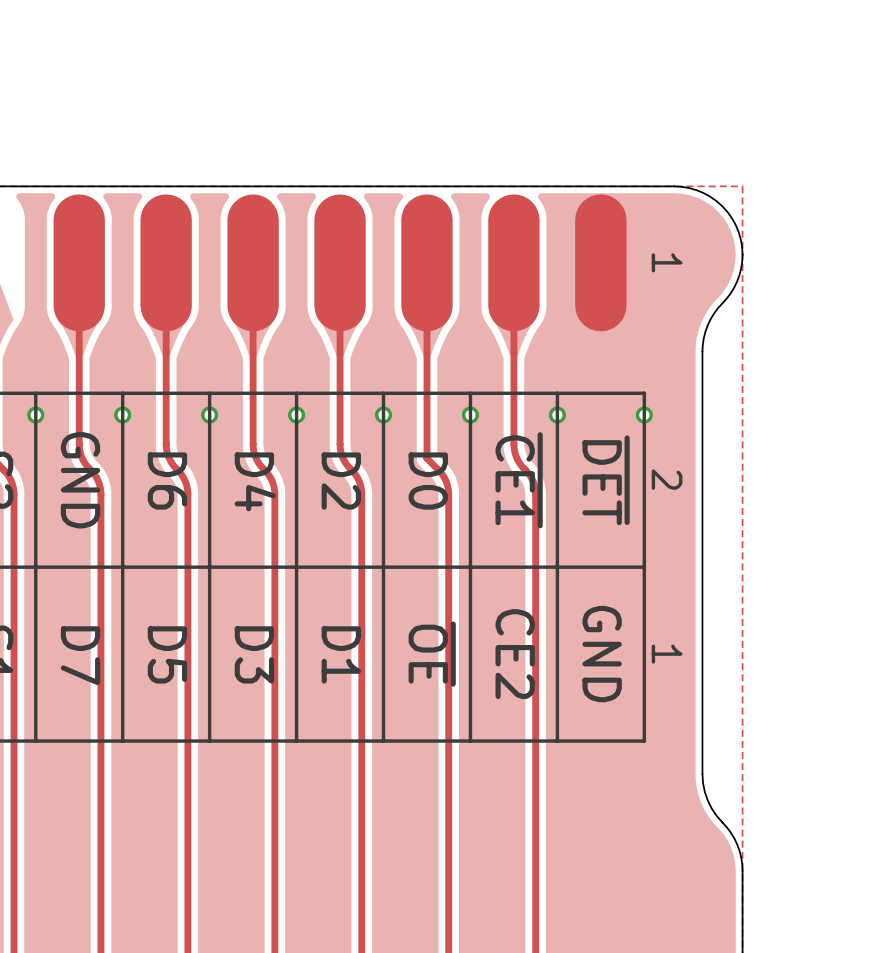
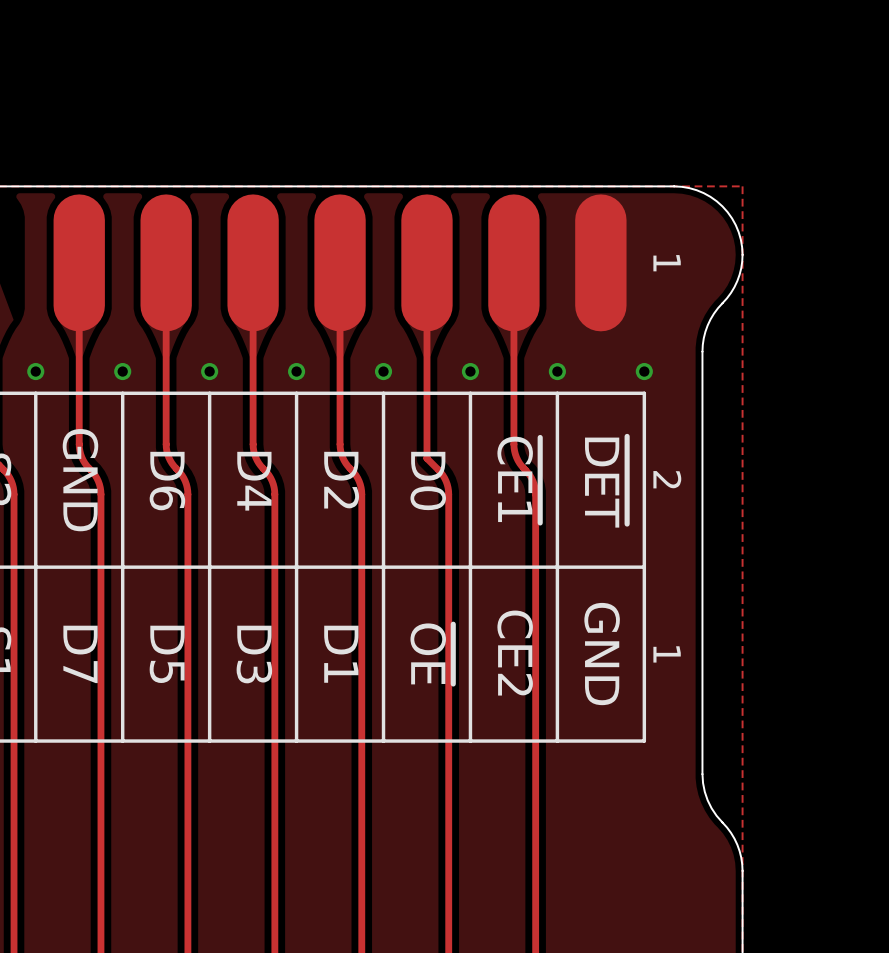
via position: (35, 415) -> (35, 371)
via position: (122, 415) -> (122, 371)
via position: (209, 415) -> (209, 371)
via position: (296, 415) -> (296, 371)
via position: (383, 415) -> (383, 371)
via position: (470, 415) -> (470, 371)
via position: (557, 415) -> (557, 371)
via position: (644, 415) -> (644, 371)

